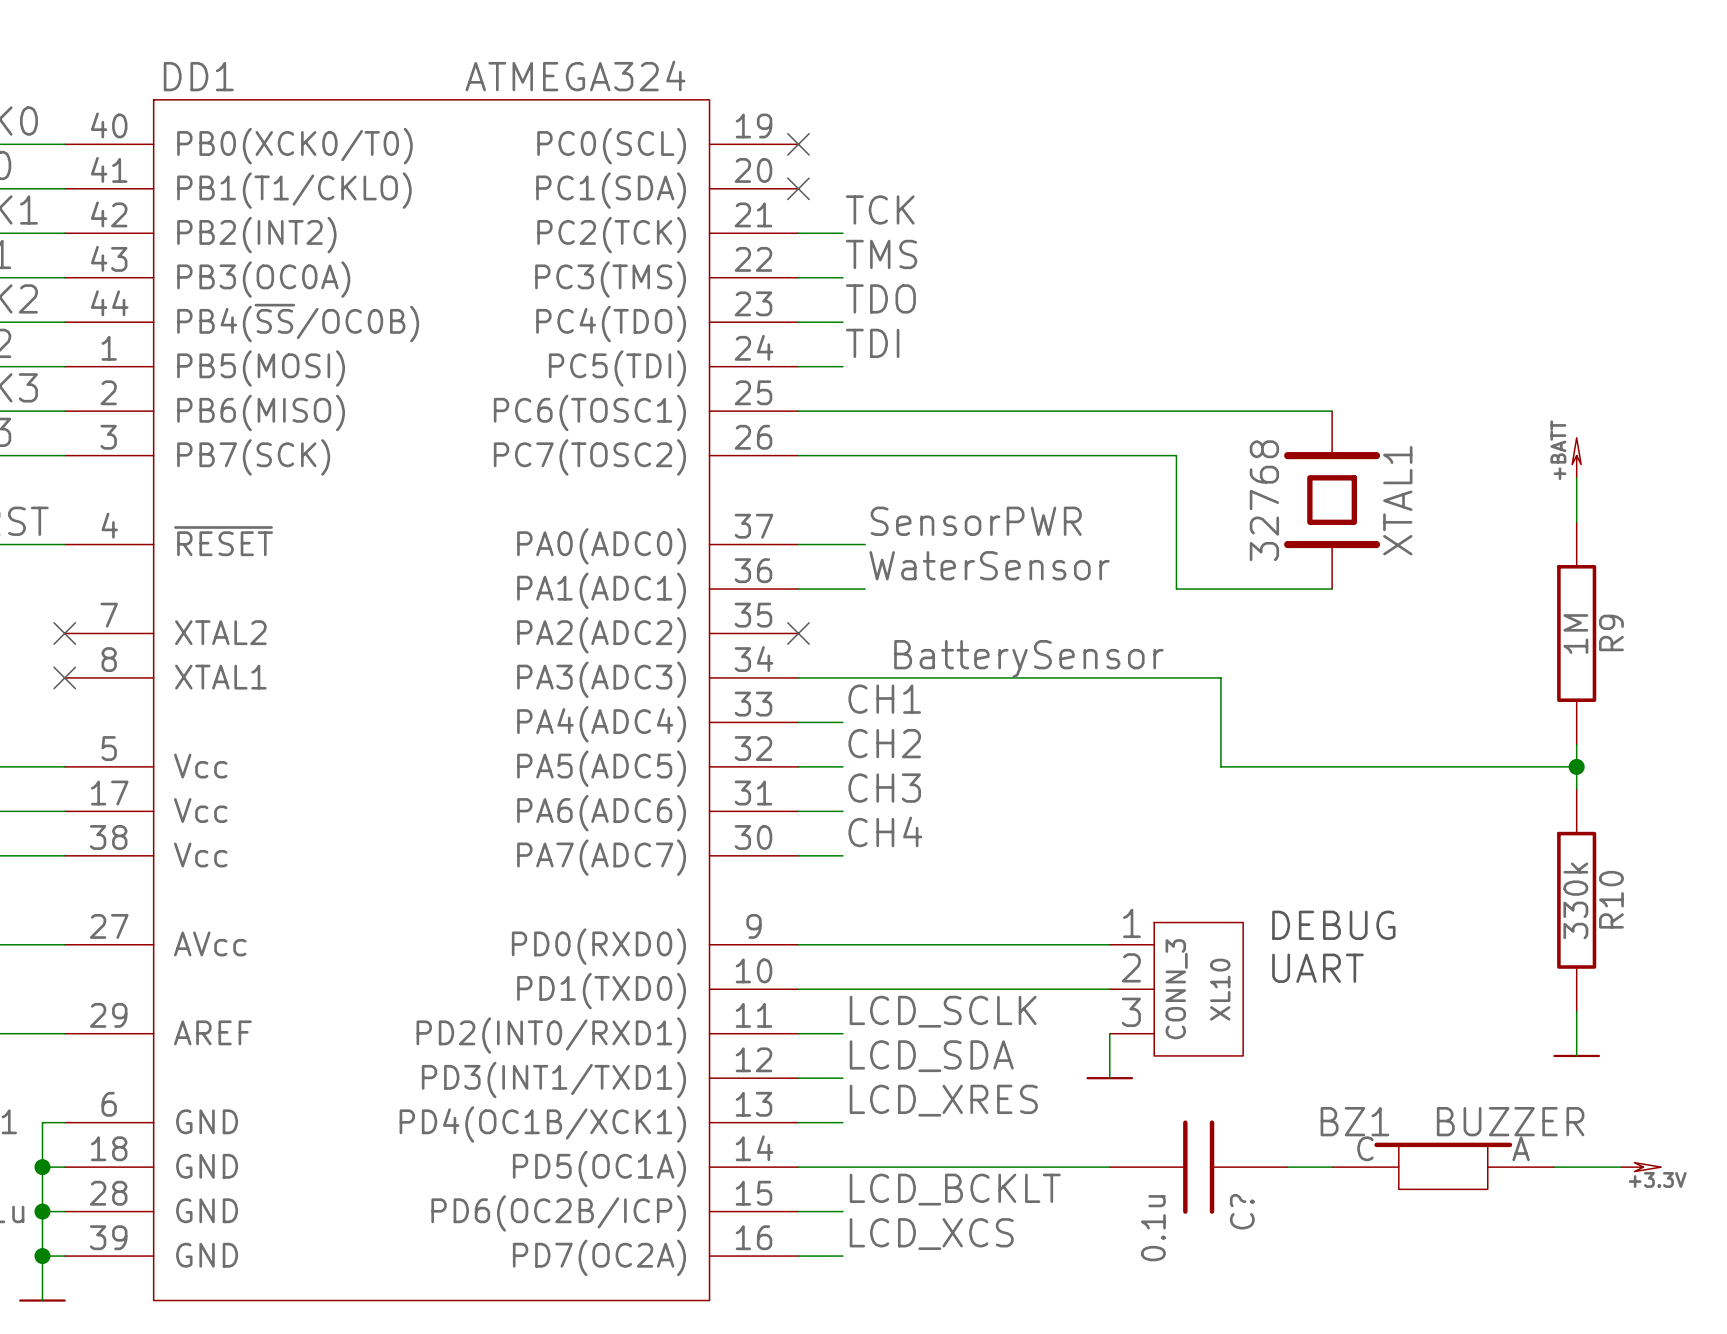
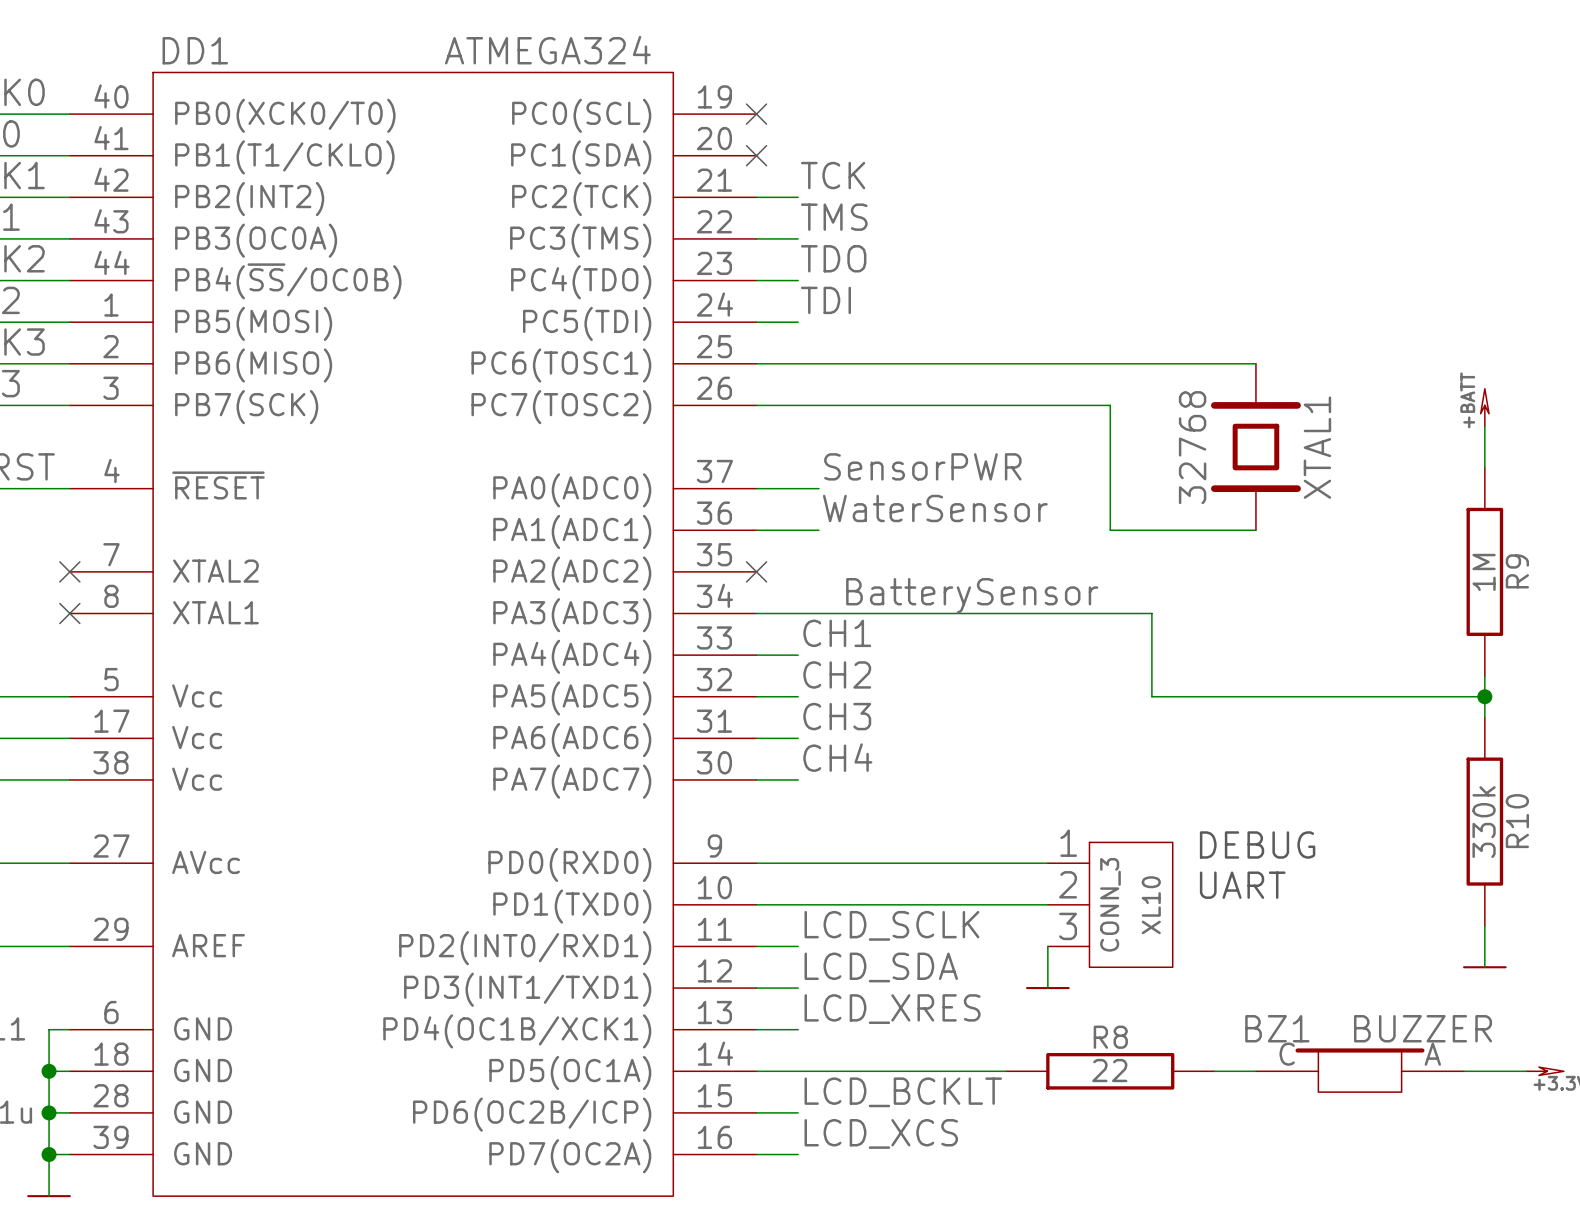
R8: none -> 22 (1110, 1071)
C?: 0.1u (1198, 1167) -> none

